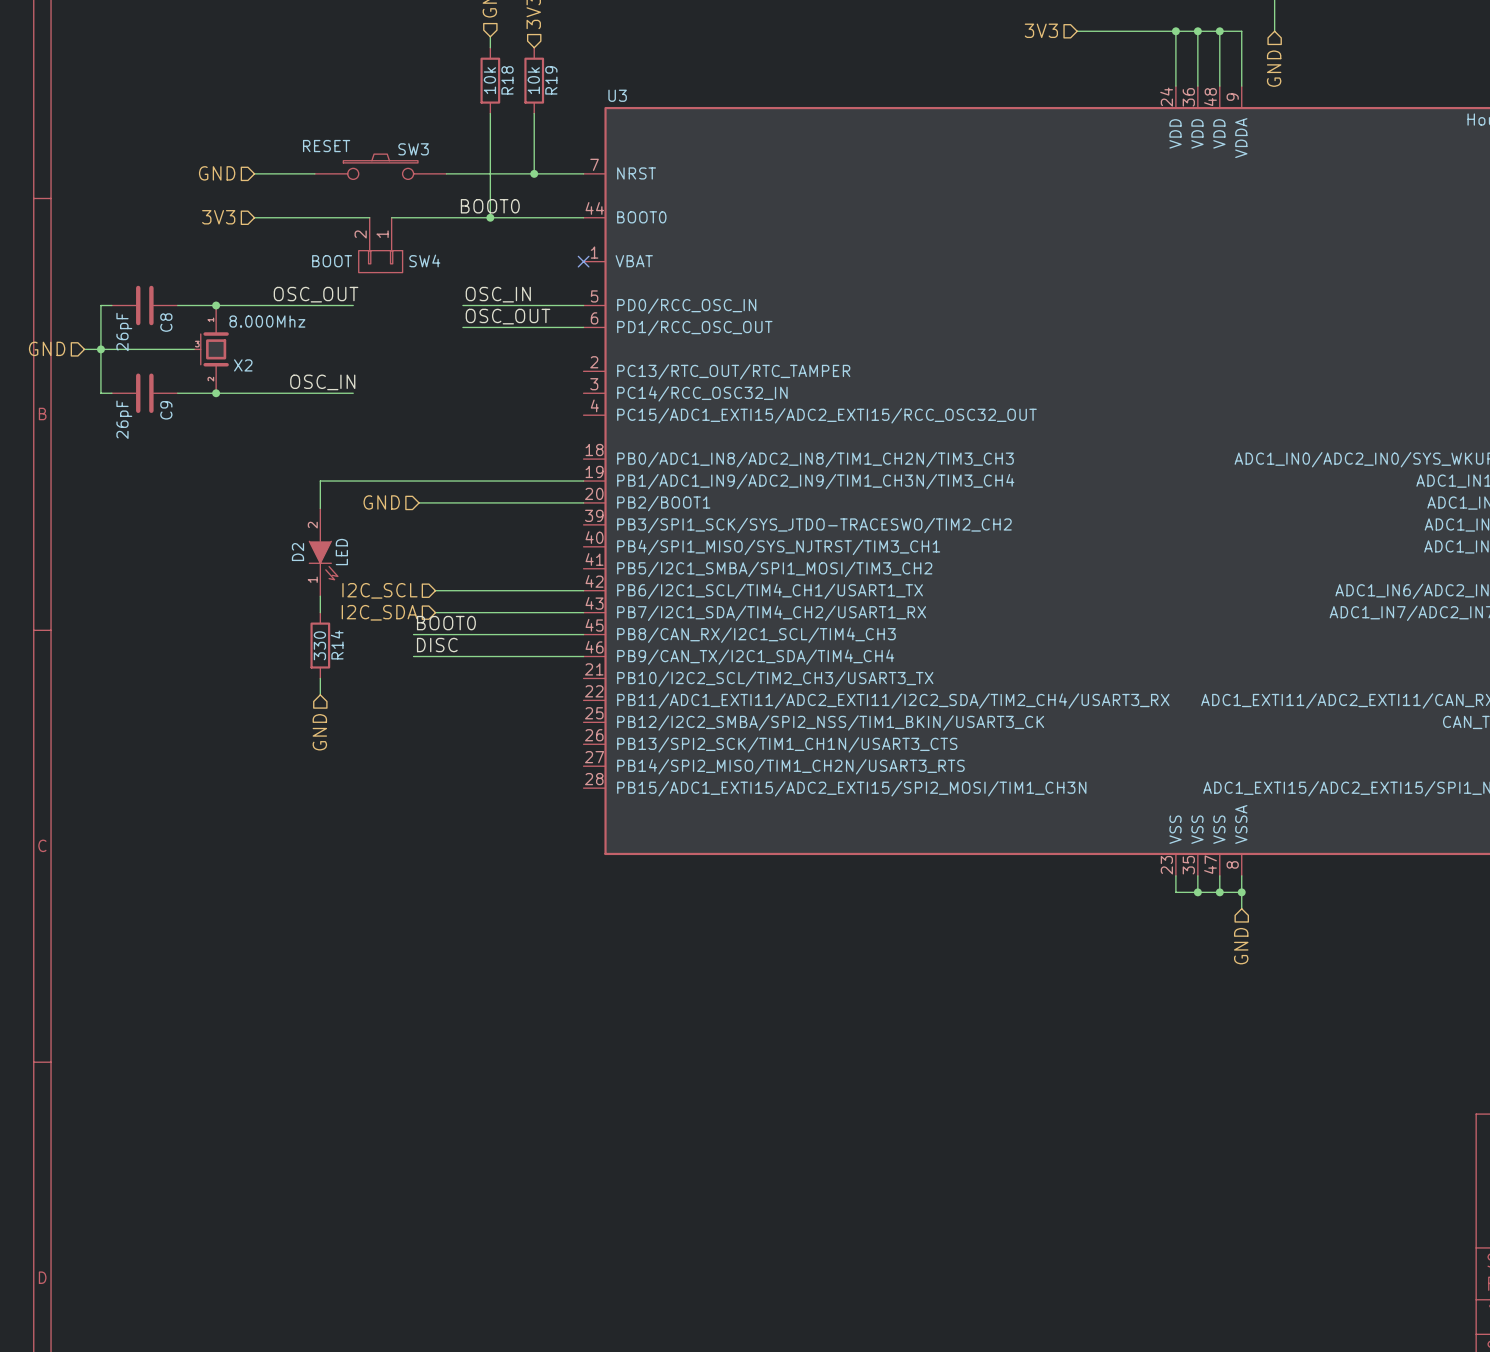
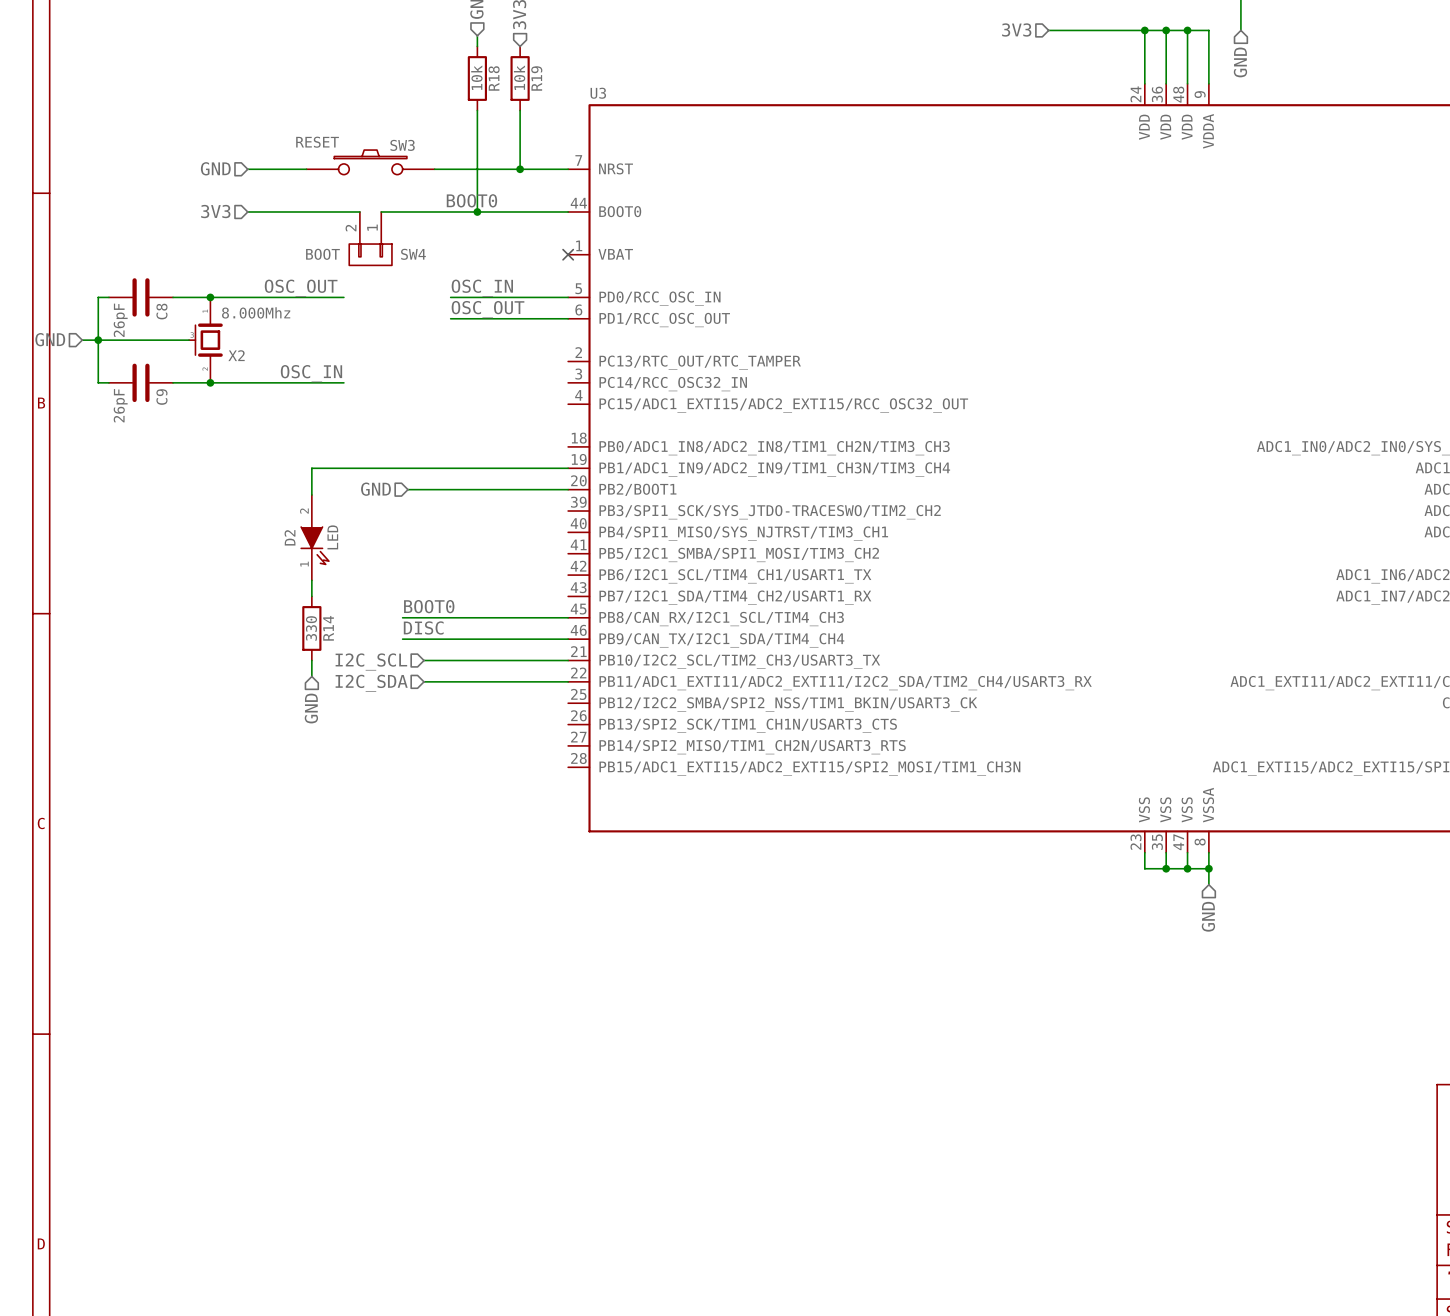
hierarchical label position: I2C_SCL (379, 590) -> I2C_SCL (371, 661)
wire: (435, 590) (583, 590) -> (423, 681) (568, 681)
hierarchical label position: I2C_SDA (379, 612) -> I2C_SDA (371, 683)
wire: (435, 612) (583, 612) -> (423, 660) (568, 660)

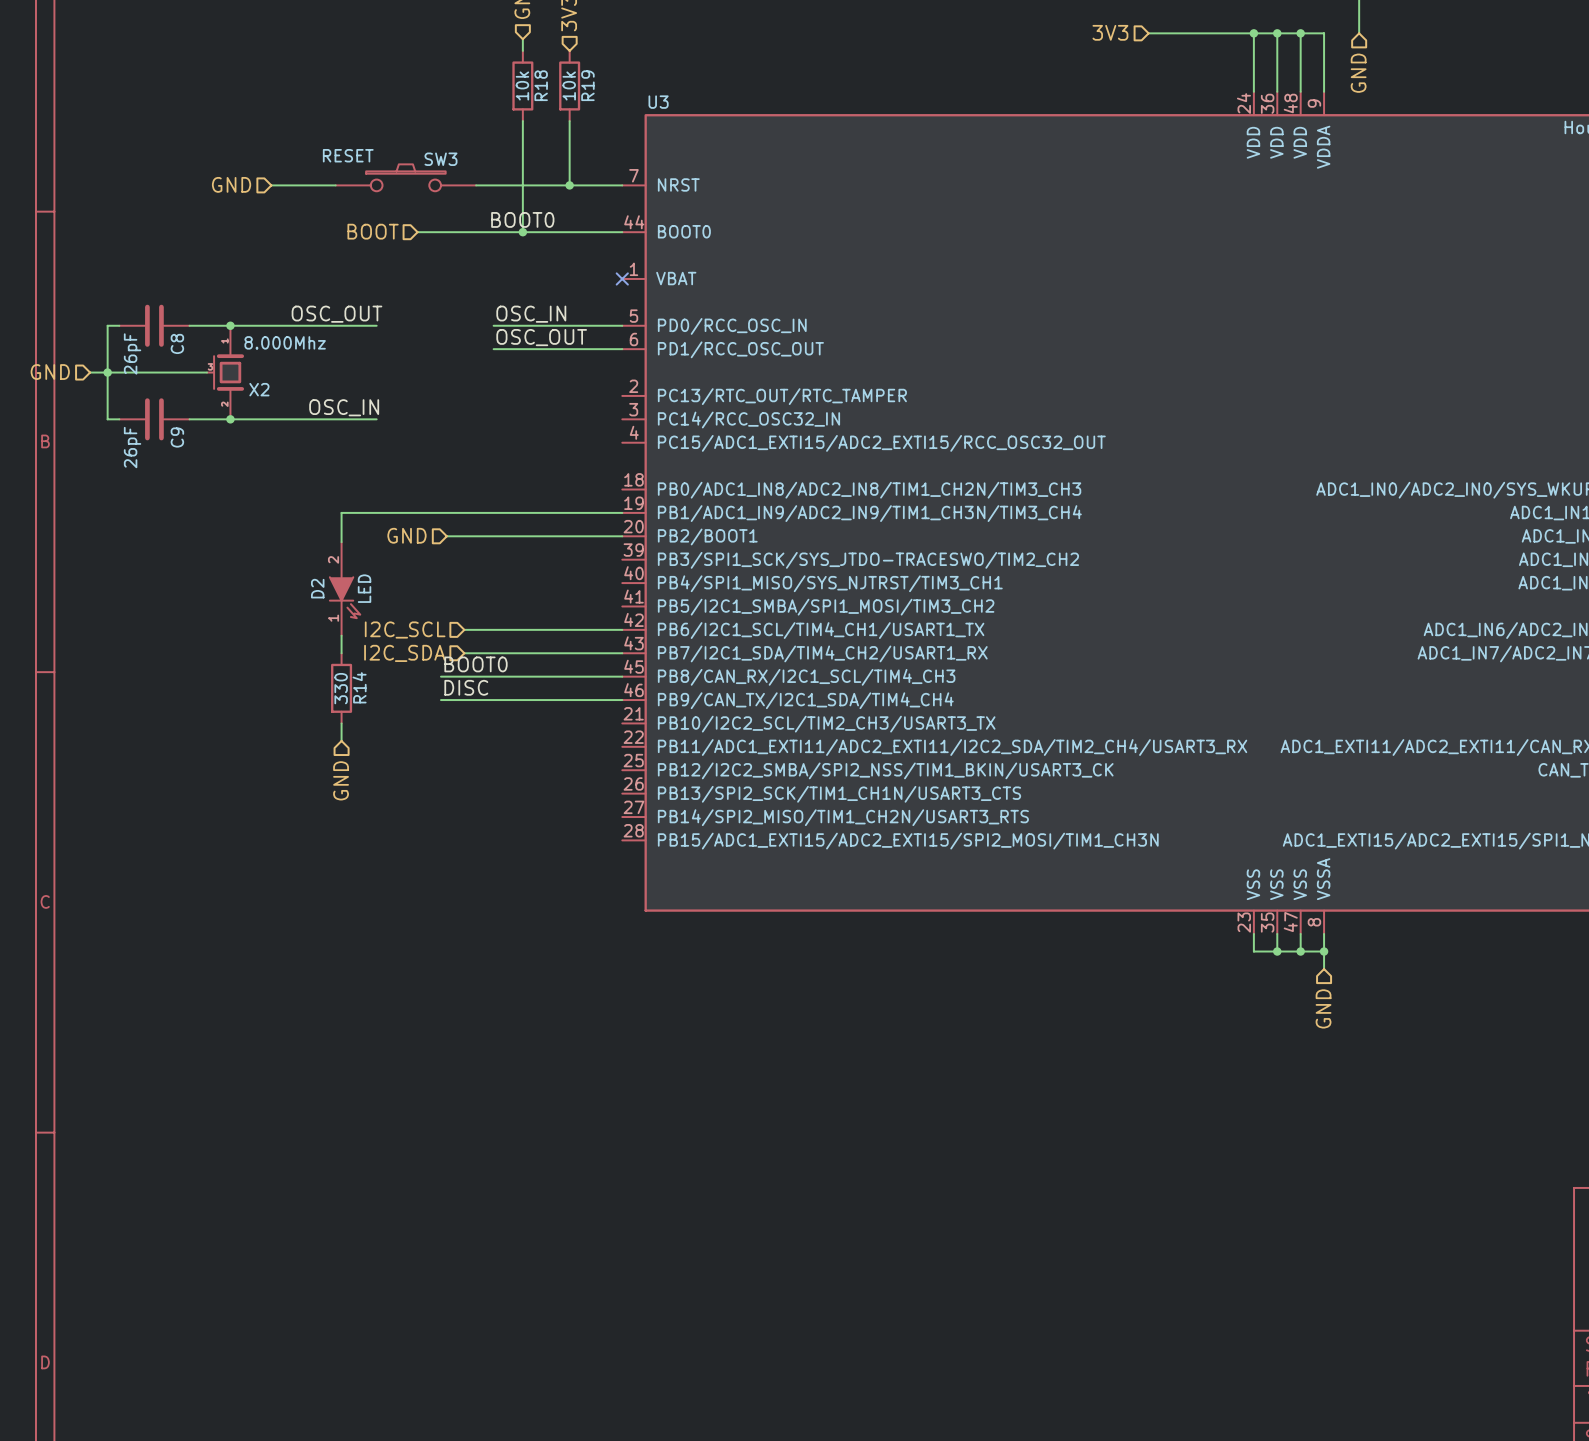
hierarchical label: 3V3 (215, 211) -> none
wire: (247, 211) (359, 211) -> none
hierarchical label: none -> BOOT (373, 231)
SW4: BOOT (370, 238) -> none
wire: (423, 660) (568, 660) -> (464, 653) (622, 653)
hierarchical label position: I2C_SCL (371, 661) -> I2C_SCL (405, 630)
wire: (423, 681) (568, 681) -> (464, 629) (622, 629)
hierarchical label position: I2C_SDA (371, 683) -> I2C_SDA (404, 653)

